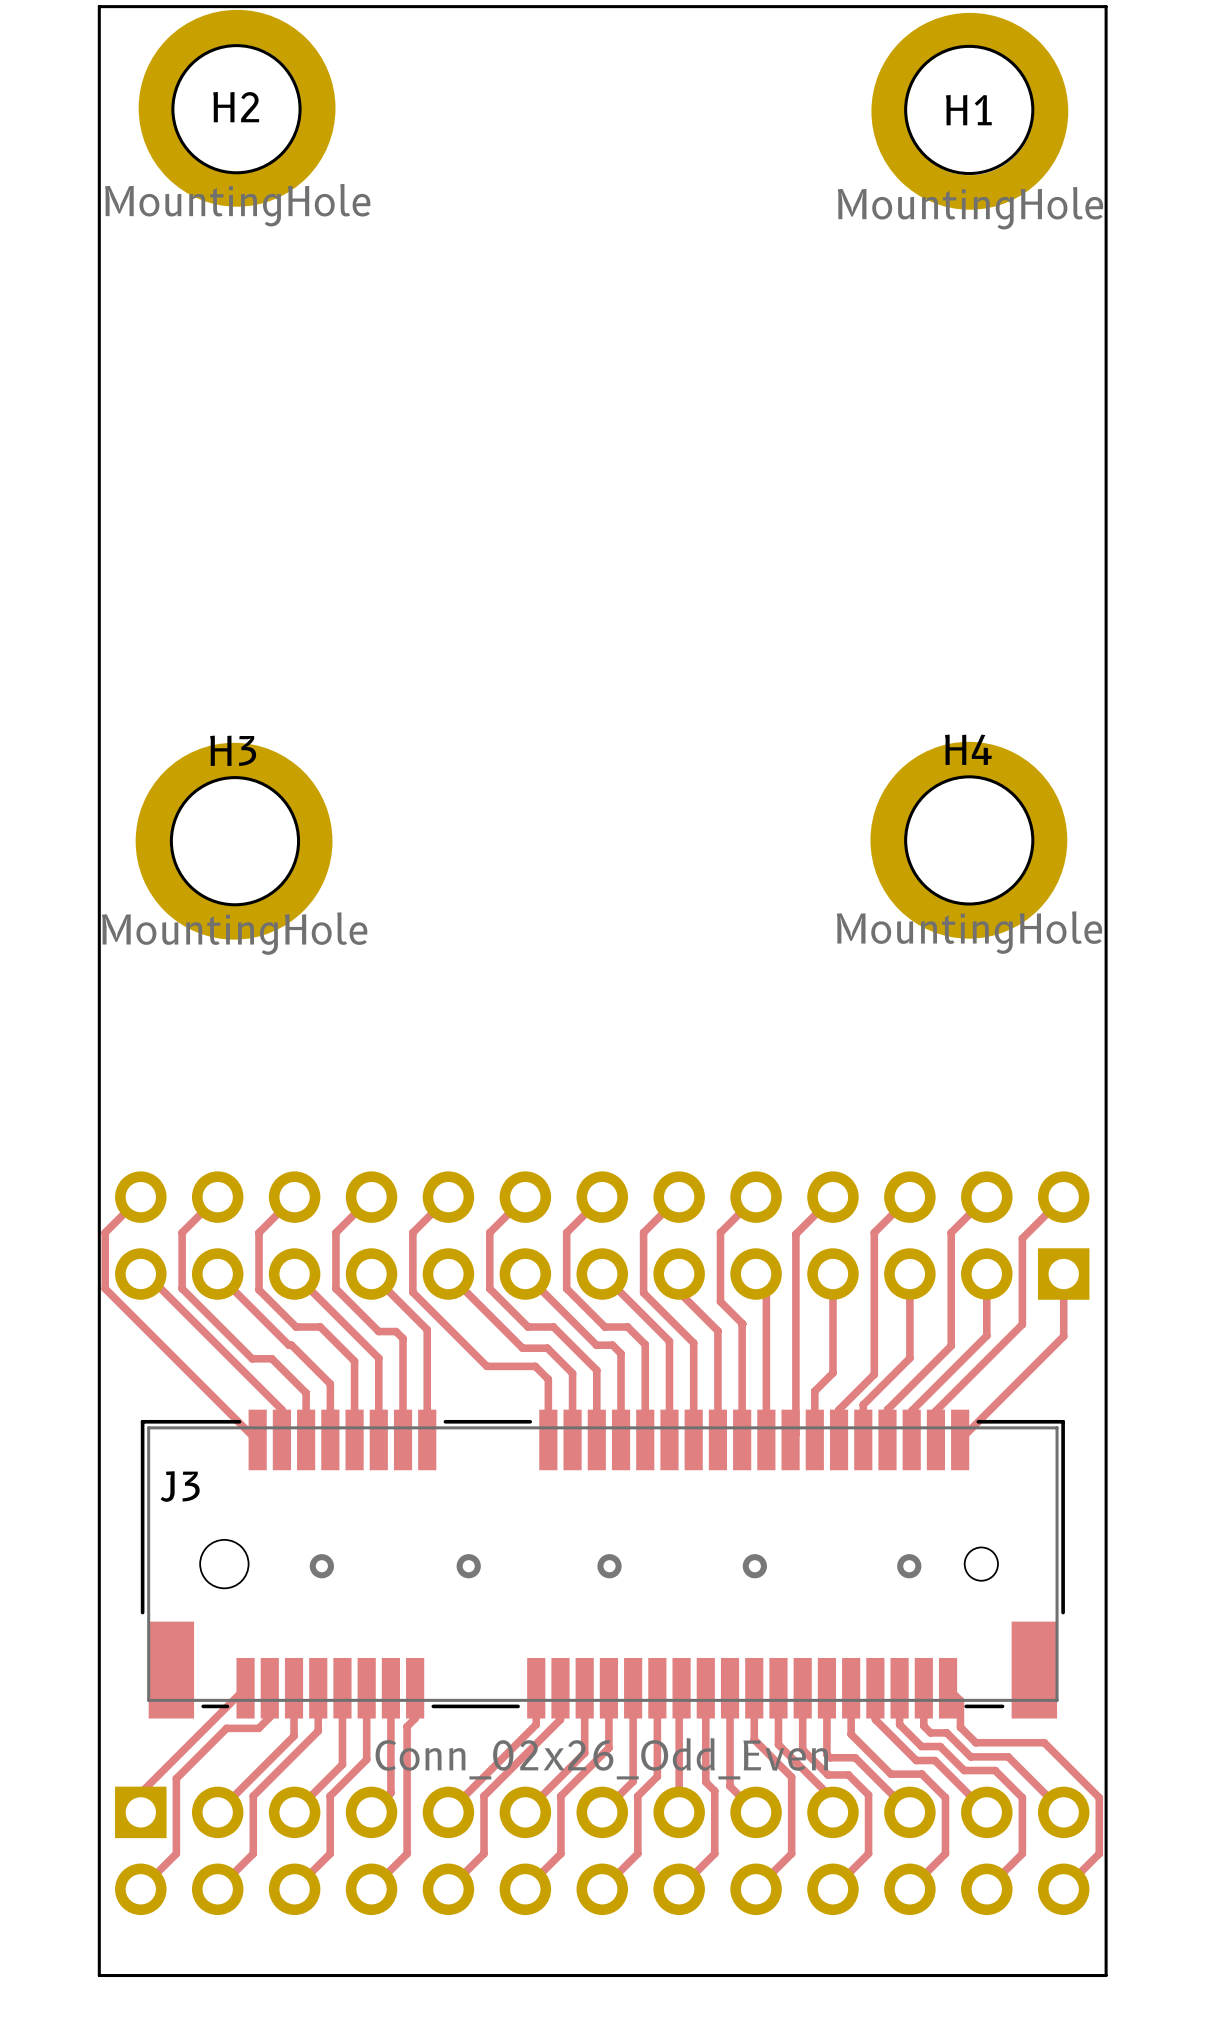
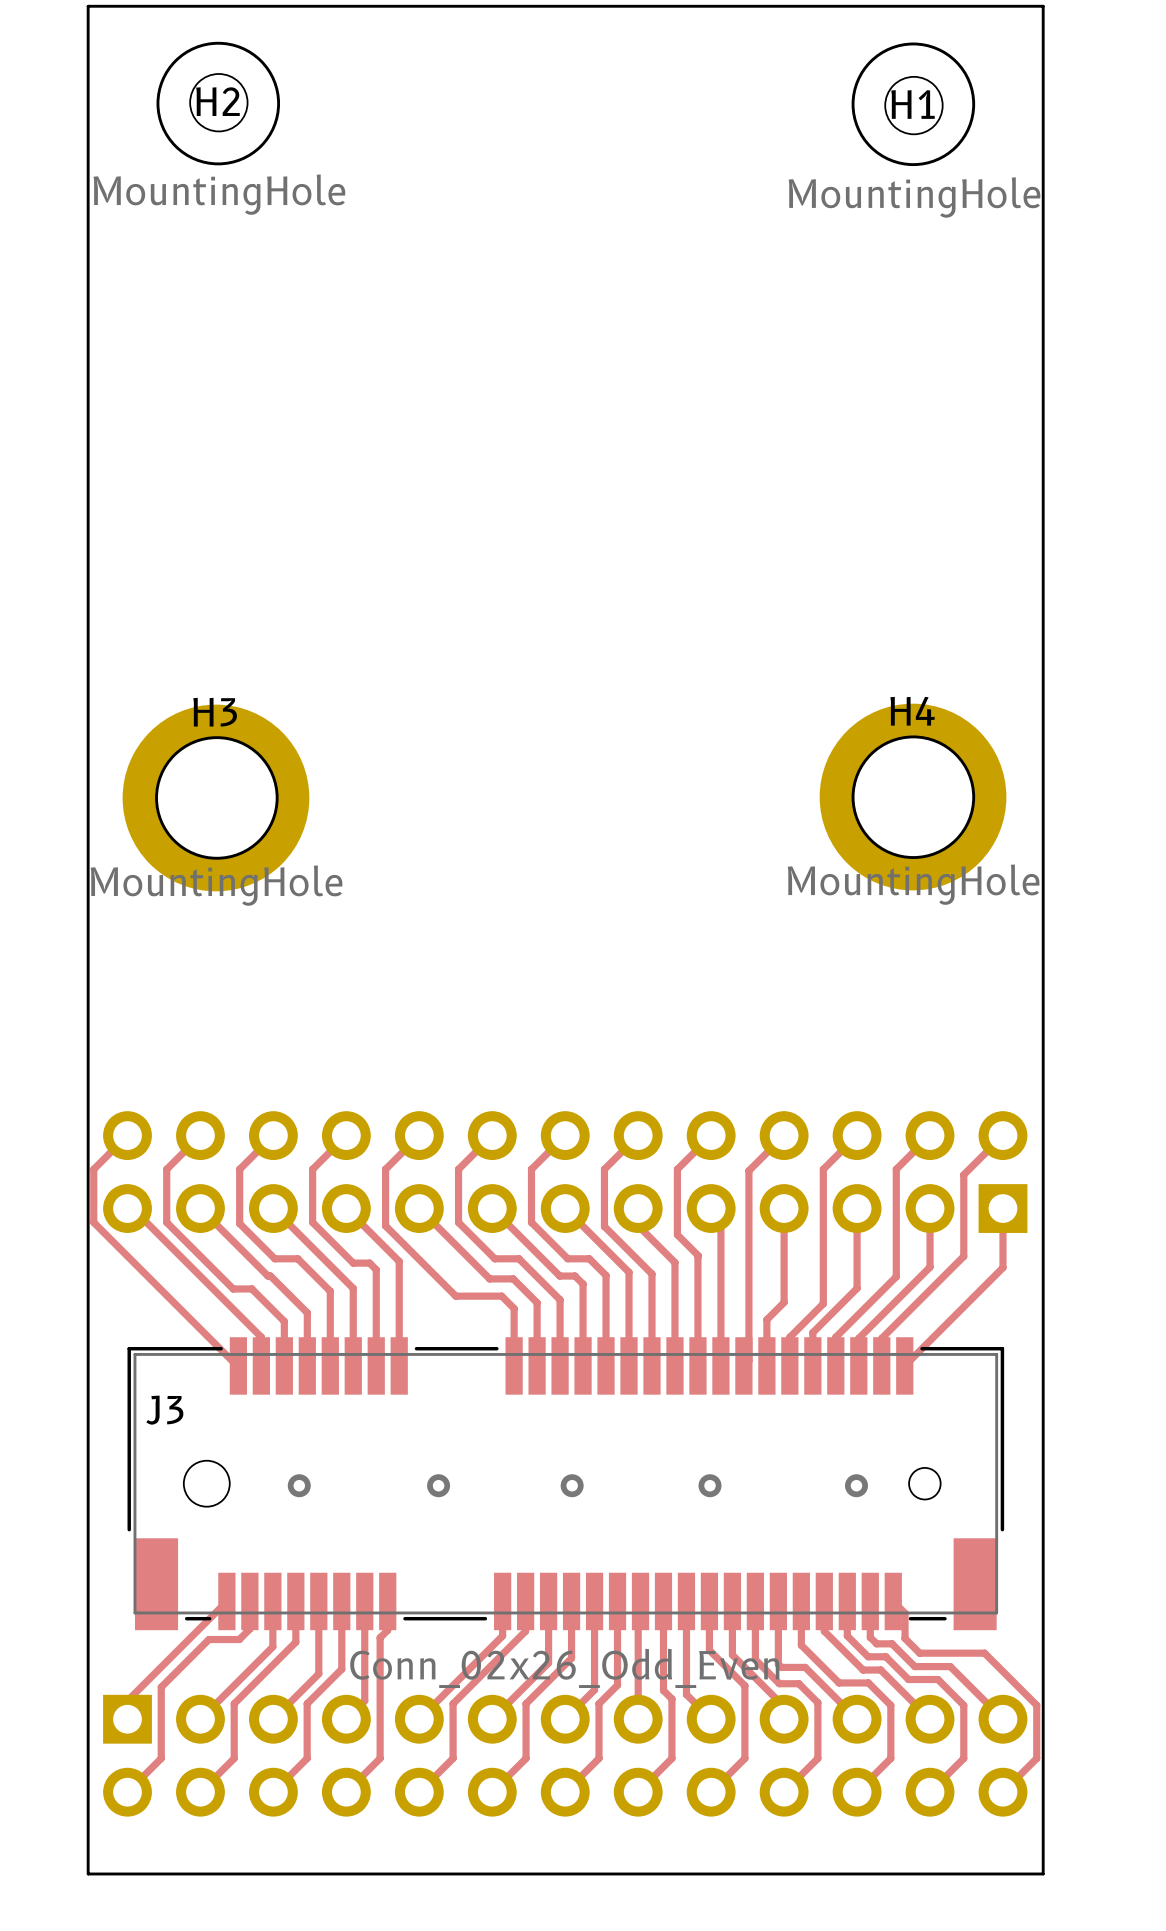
H2 footprint: [138, 9, 336, 207] -> [190, 73, 248, 132]
H1 footprint: [871, 12, 1069, 210] -> [885, 76, 943, 135]

